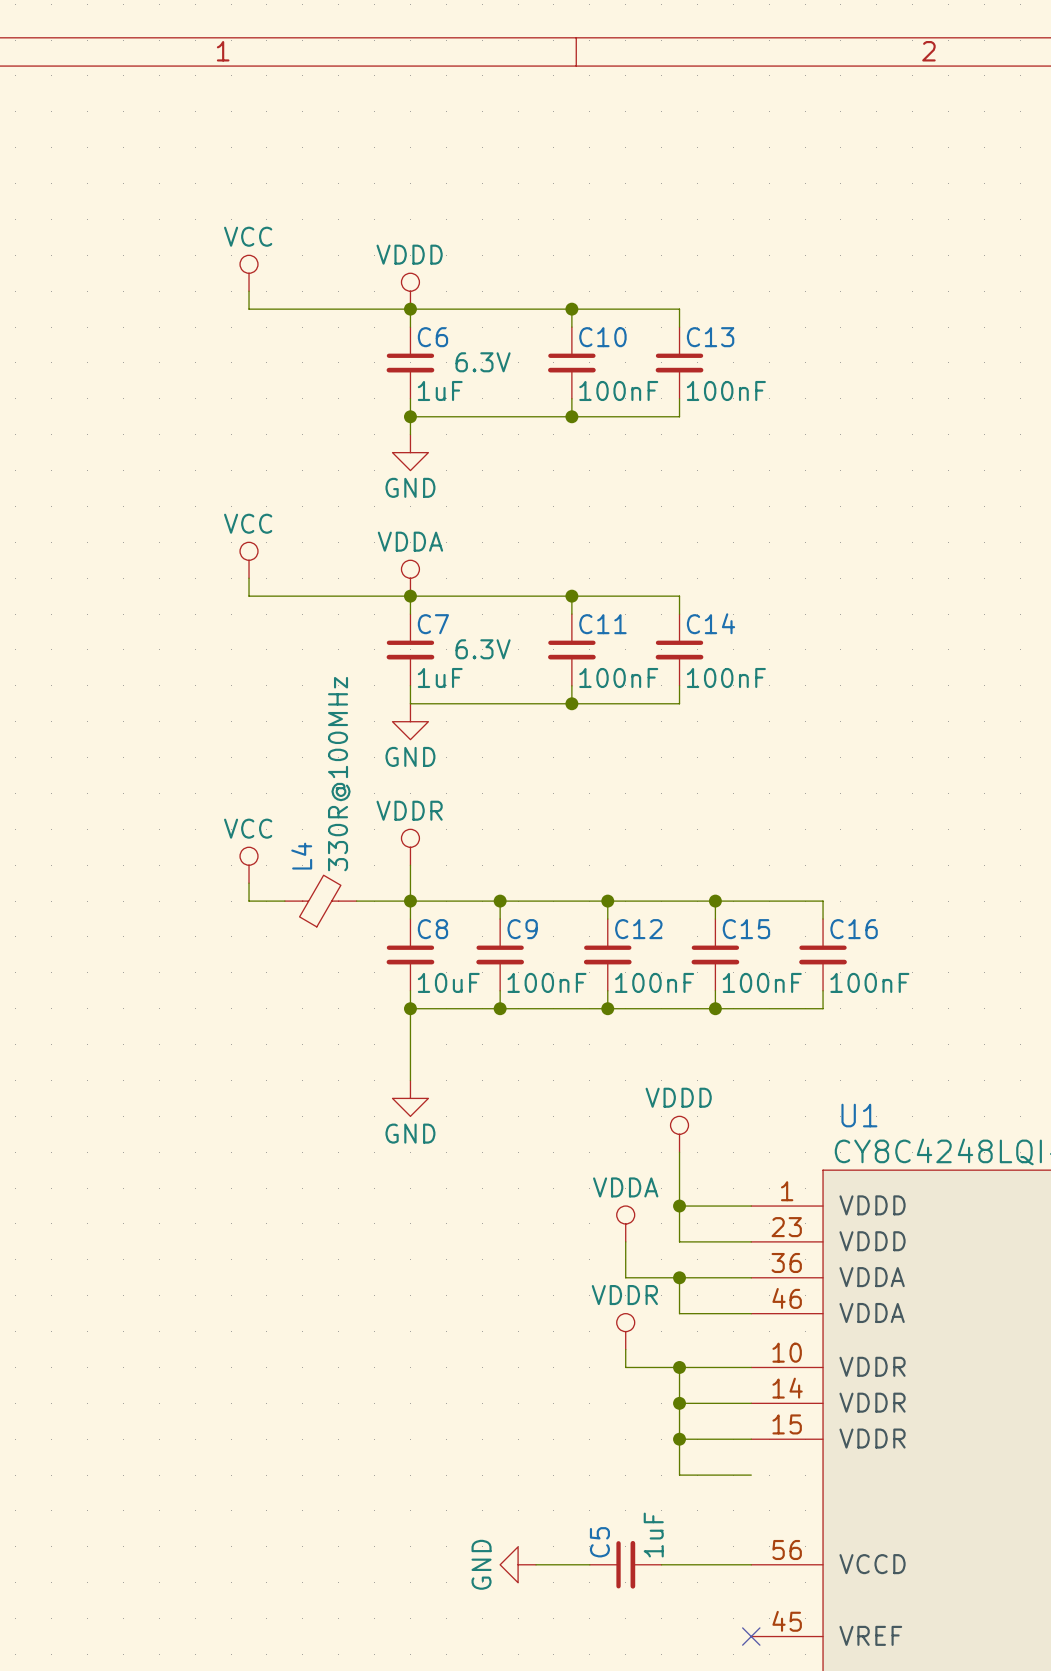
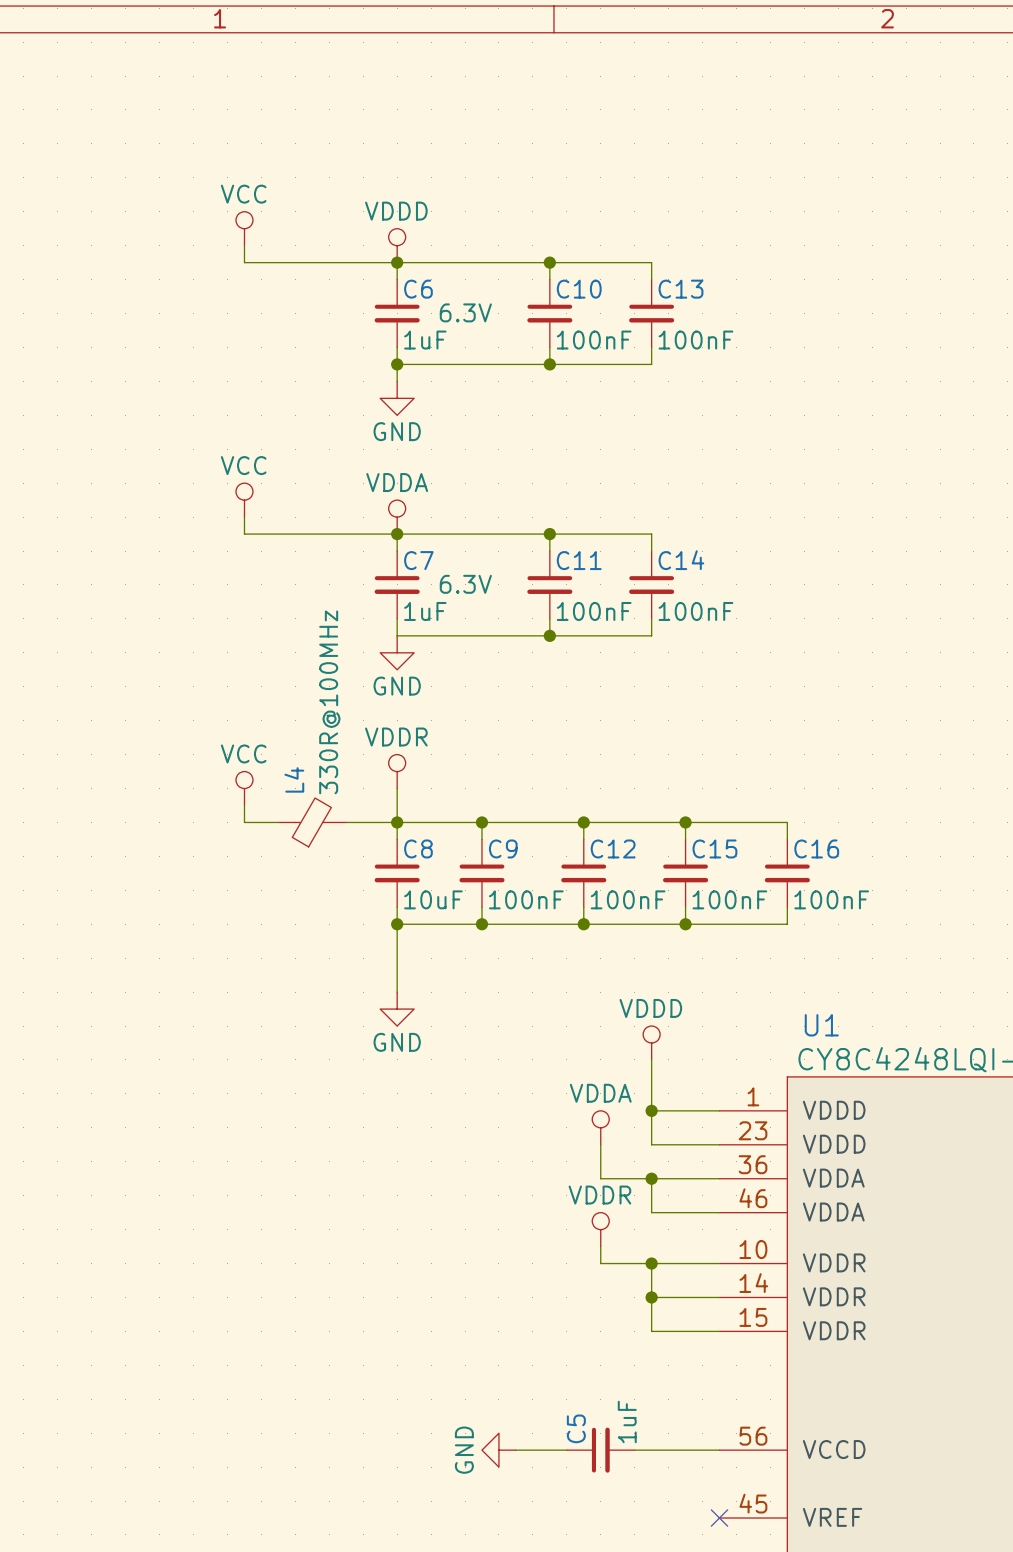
wire: (679, 1439) (679, 1475) (751, 1475) -> none
junction: (679, 1439) -> none

